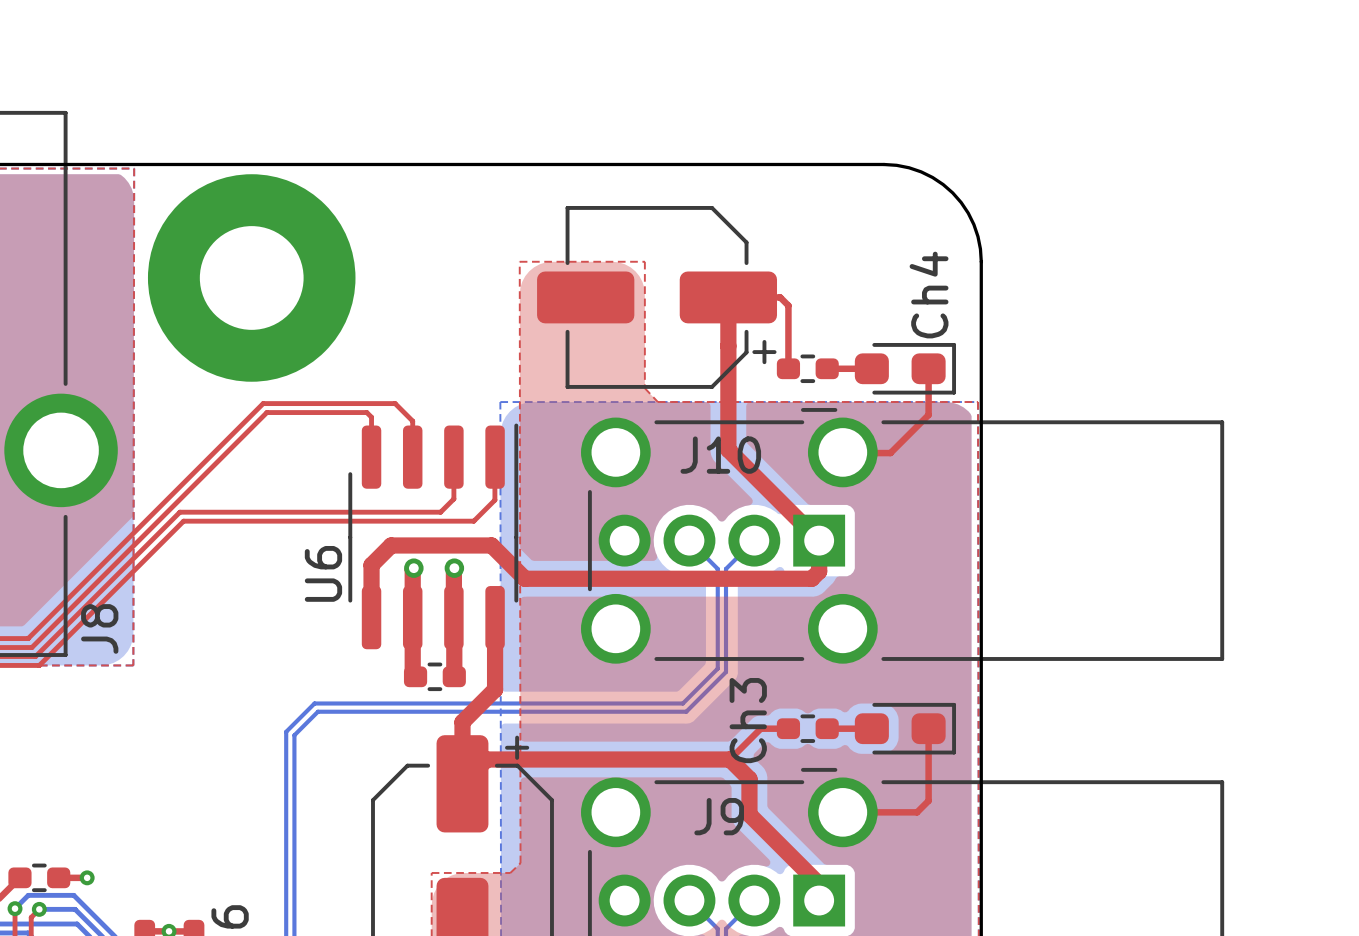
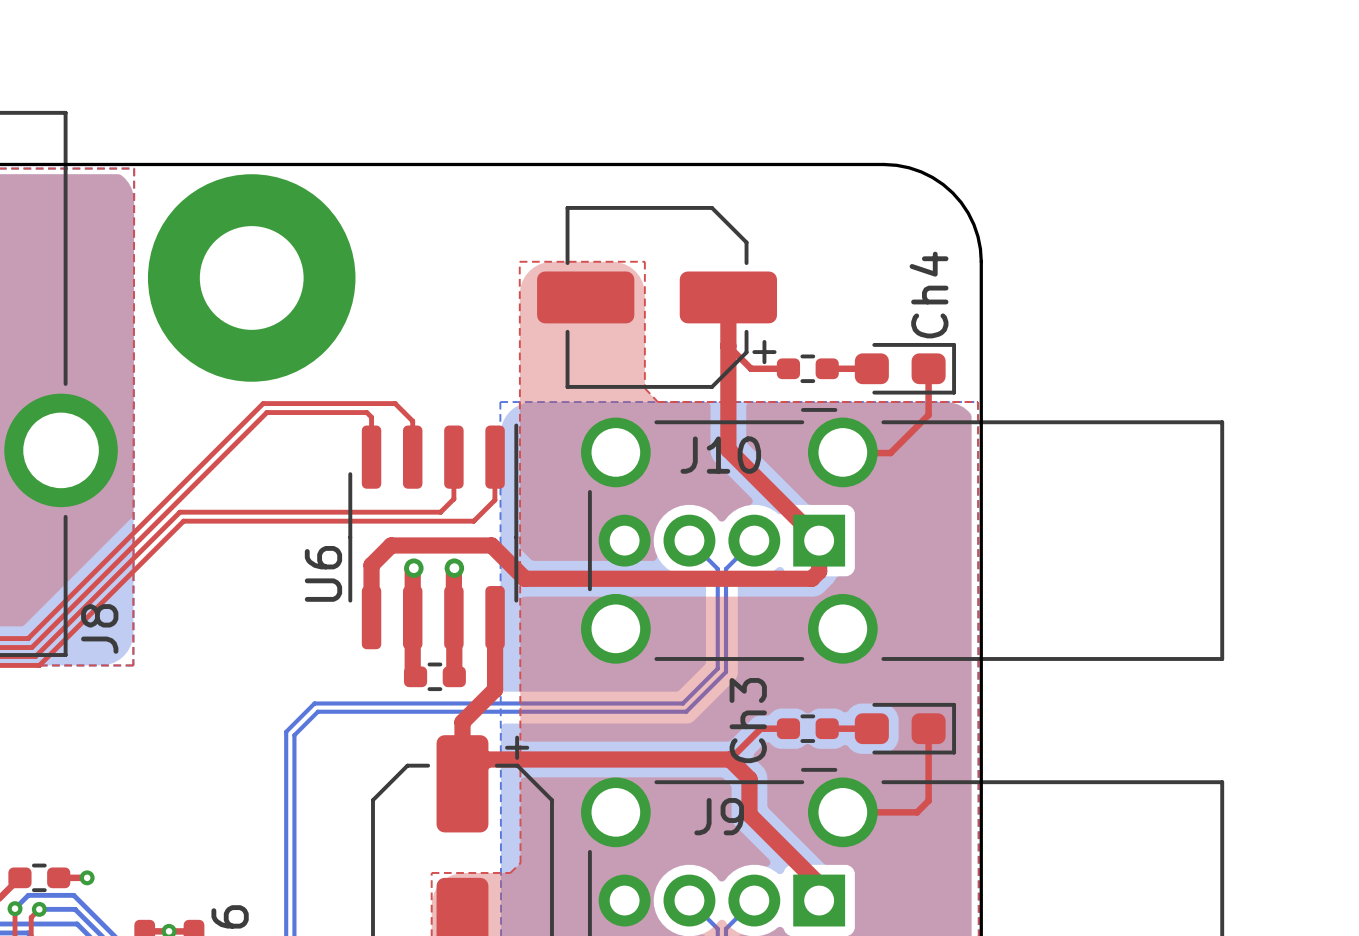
top track: (728, 297) (780, 297) (788, 305) (788, 368) -> (728, 346) (751, 368) (788, 368)

